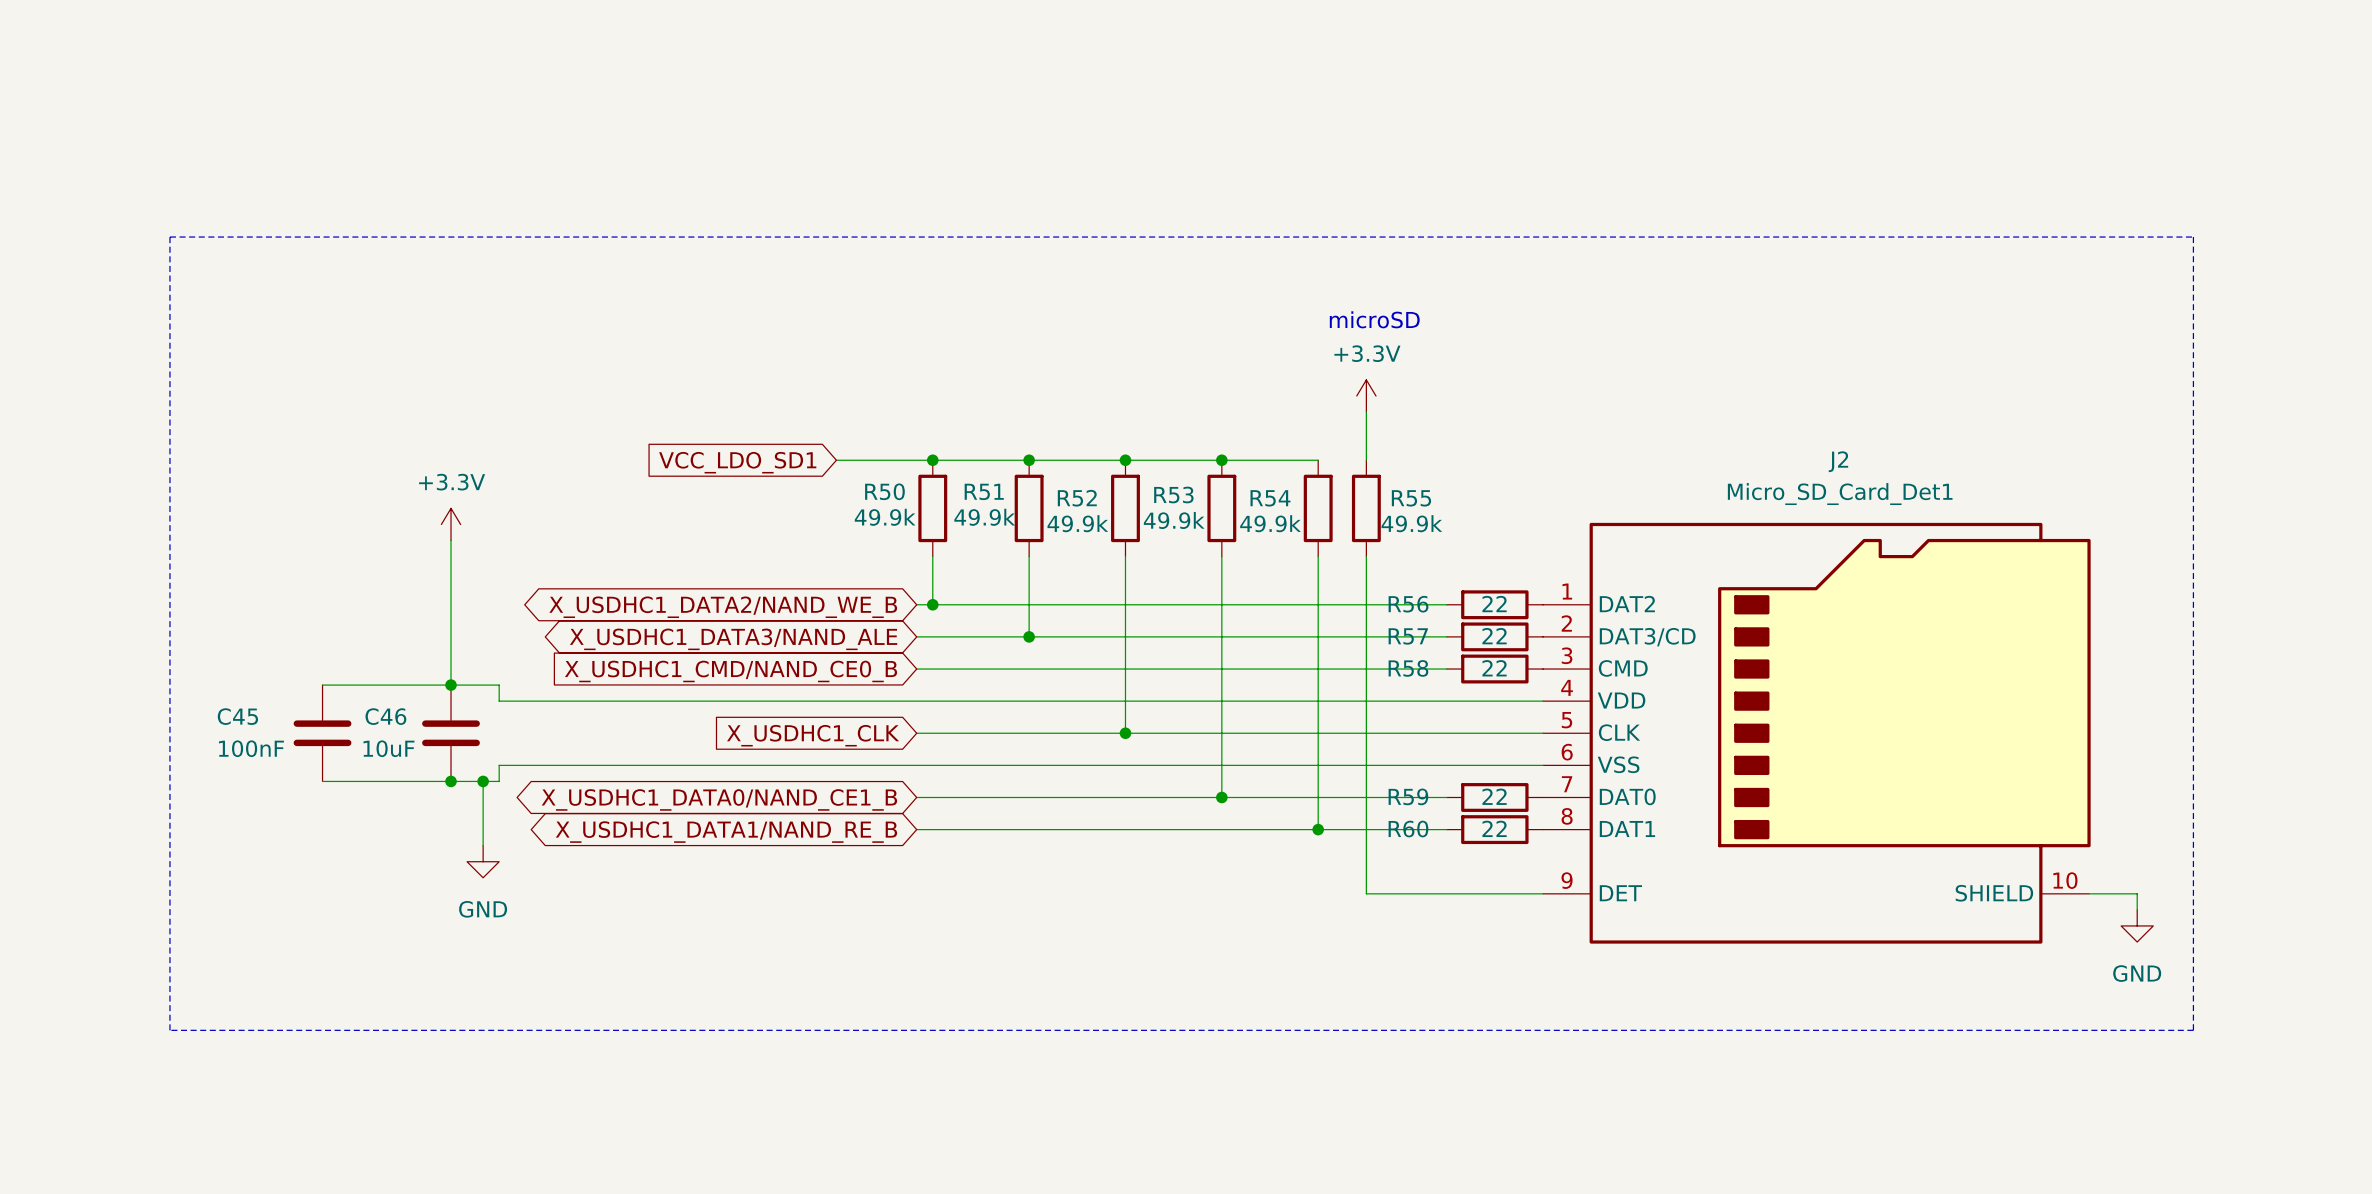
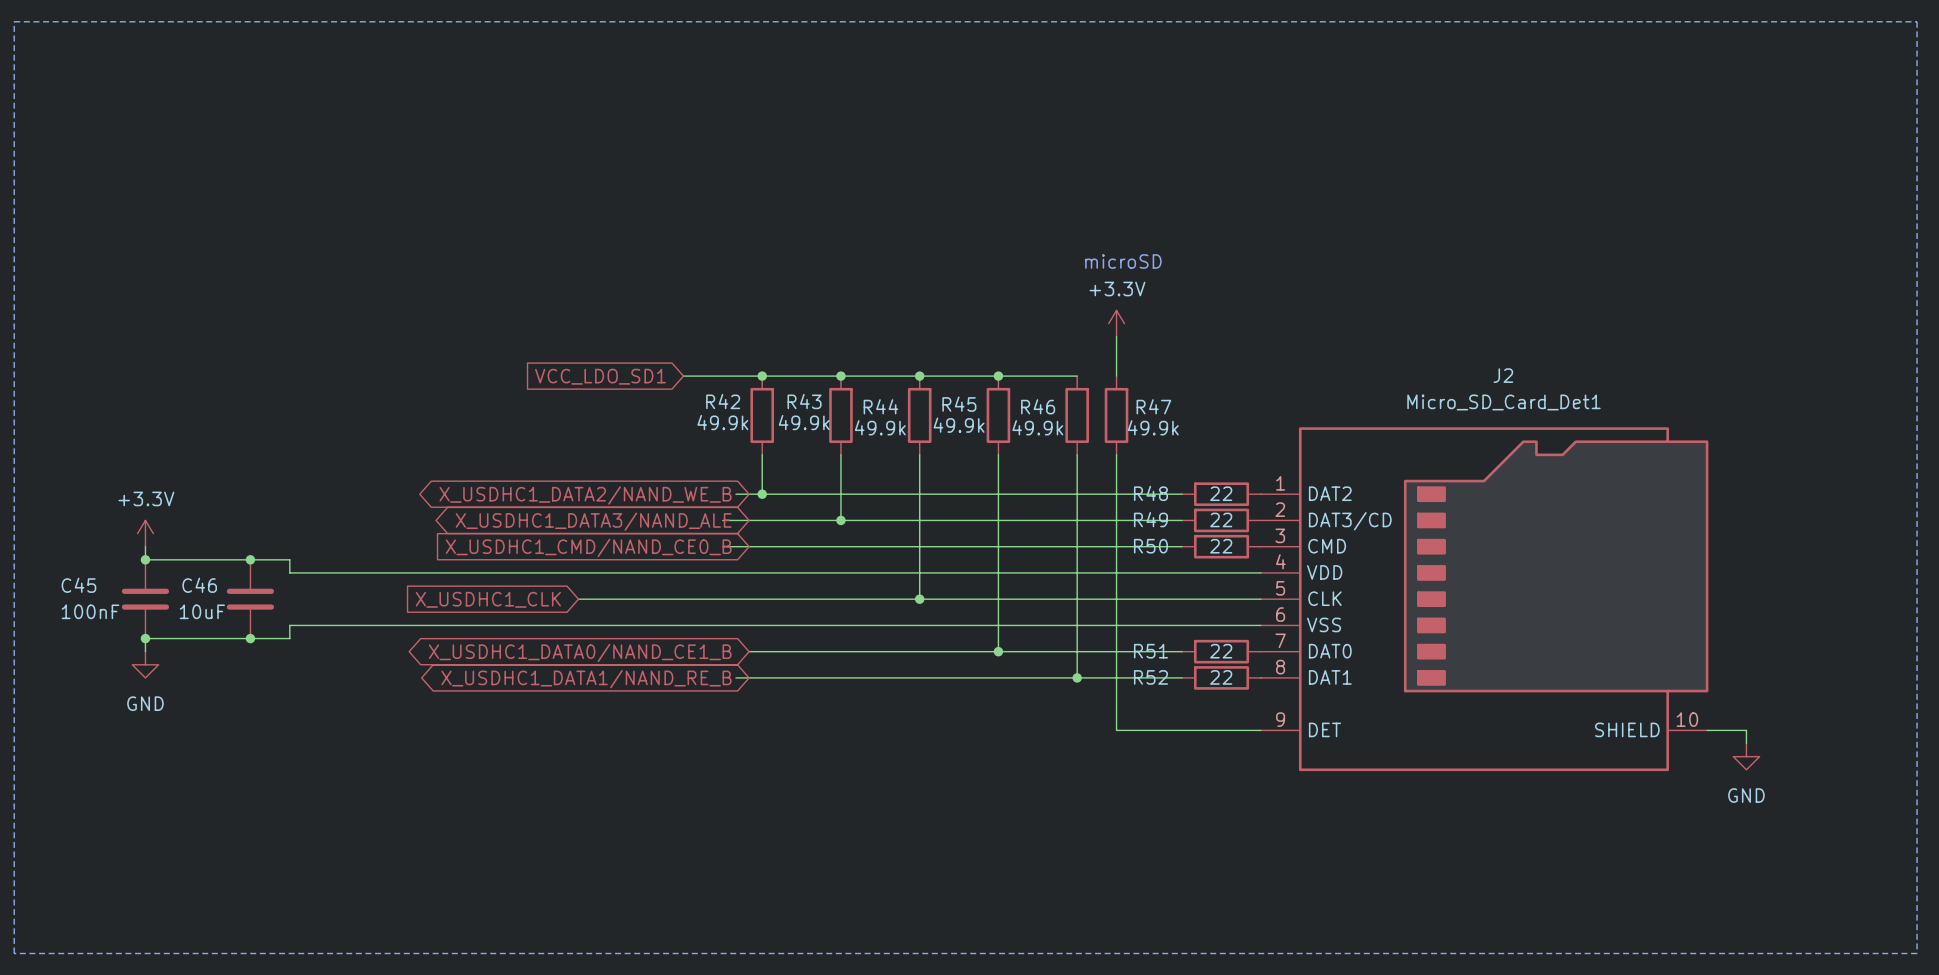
line: (169, 237) (2193, 237) (2193, 1030) (169, 1030) (169, 237) -> (14, 21) (14, 953) (1917, 953) (1917, 21) (14, 21)
R50 name: R50 (884, 491) -> R42 (723, 401)
R51 name: R51 (984, 491) -> R43 (804, 401)
R53 name: R53 (1173, 494) -> R45 (959, 404)
R52 name: R52 (1077, 498) -> R44 (880, 406)
R54 name: R54 (1270, 498) -> R46 (1038, 406)
R55 name: R55 (1411, 498) -> R47 (1153, 406)
power symbol position: +3.3V (451, 524) -> +3.3V (145, 533)
wire: (451, 540) (451, 685) -> none
wire: none -> (735, 494) (749, 494)
R56 name: R56 (1408, 604) -> R48 (1150, 493)
wire: none -> (722, 520) (749, 520)
R57 name: R57 (1408, 636) -> R49 (1150, 519)
R58 name: R58 (1408, 668) -> R50 (1150, 546)
wire: none -> (145, 546) (145, 559) (263, 559)
wire: none -> (722, 546) (749, 546)
junction: none -> (145, 559)
junction: none -> (250, 559)
wire: (354, 685) (499, 685) (499, 701) -> (289, 559) (289, 572) (407, 572)
junction: (451, 685) -> none
C45 position: (322, 733) -> (145, 599)
C46 position: (451, 733) -> (250, 599)
wire: none -> (578, 599) (749, 599)
global label position: X_USDHC1_CLK (813, 735) -> X_USDHC1_CLK (488, 599)
wire: (499, 765) (499, 781) (354, 781) -> (407, 625) (289, 625) (289, 638)
junction: none -> (145, 638)
junction: none -> (250, 638)
wire: none -> (263, 638) (145, 638) (145, 651)
junction: (451, 781) -> none
wire: (483, 781) (483, 845) -> none
junction: (483, 781) -> none
R59 name: R59 (1408, 796) -> R51 (1150, 651)
wire: none -> (735, 677) (749, 677)
R60 name: R60 (1408, 829) -> R52 (1150, 677)
power symbol position: GND (483, 861) -> GND (145, 664)

